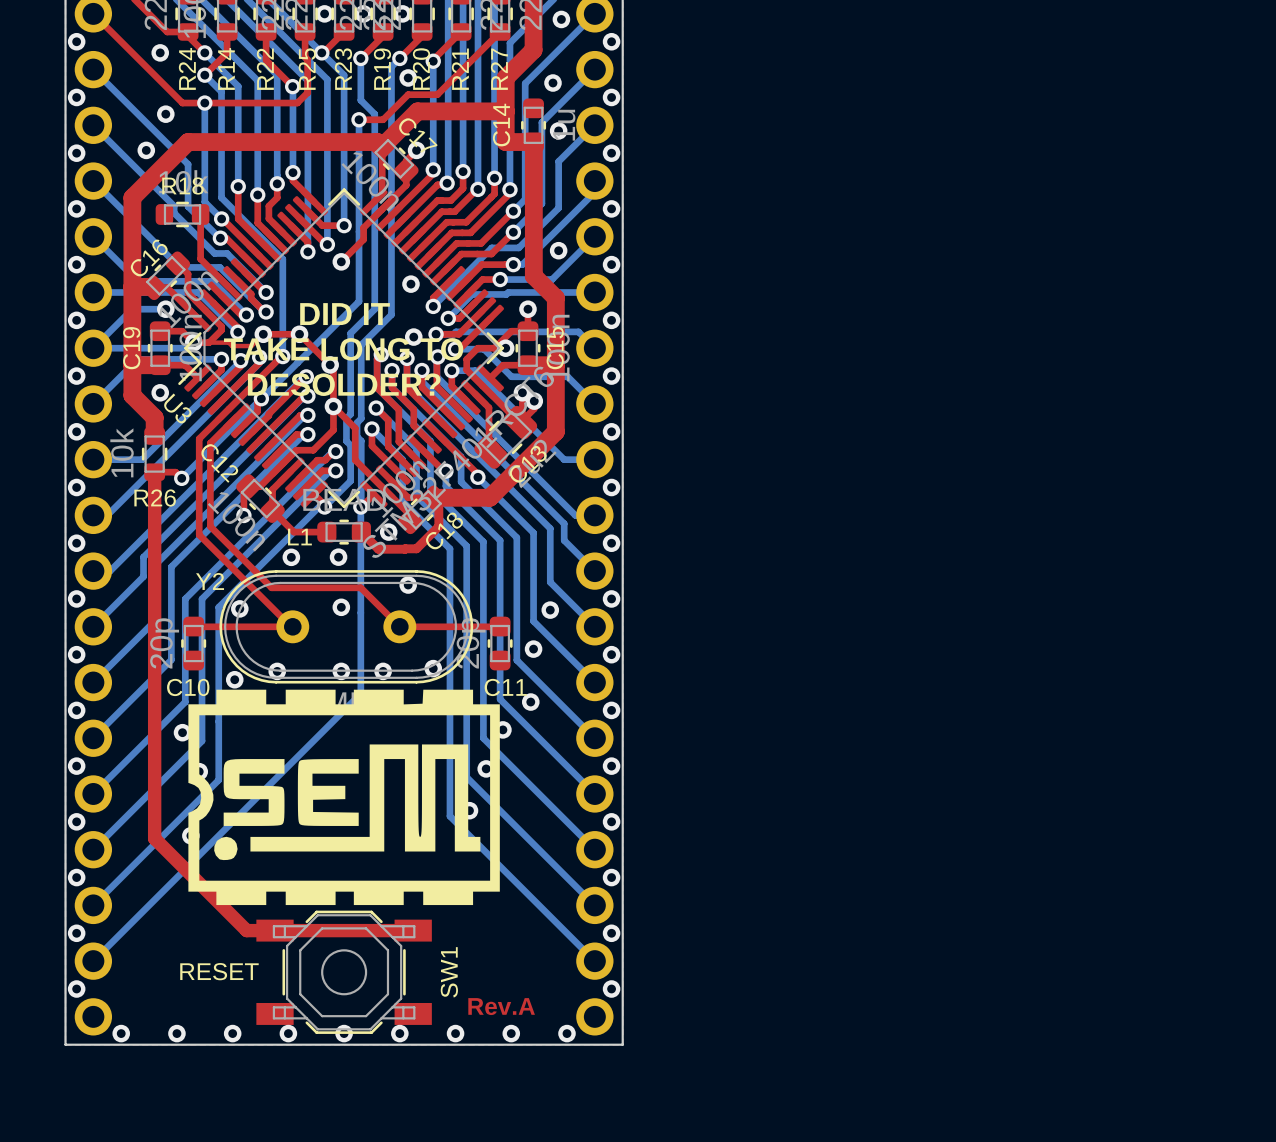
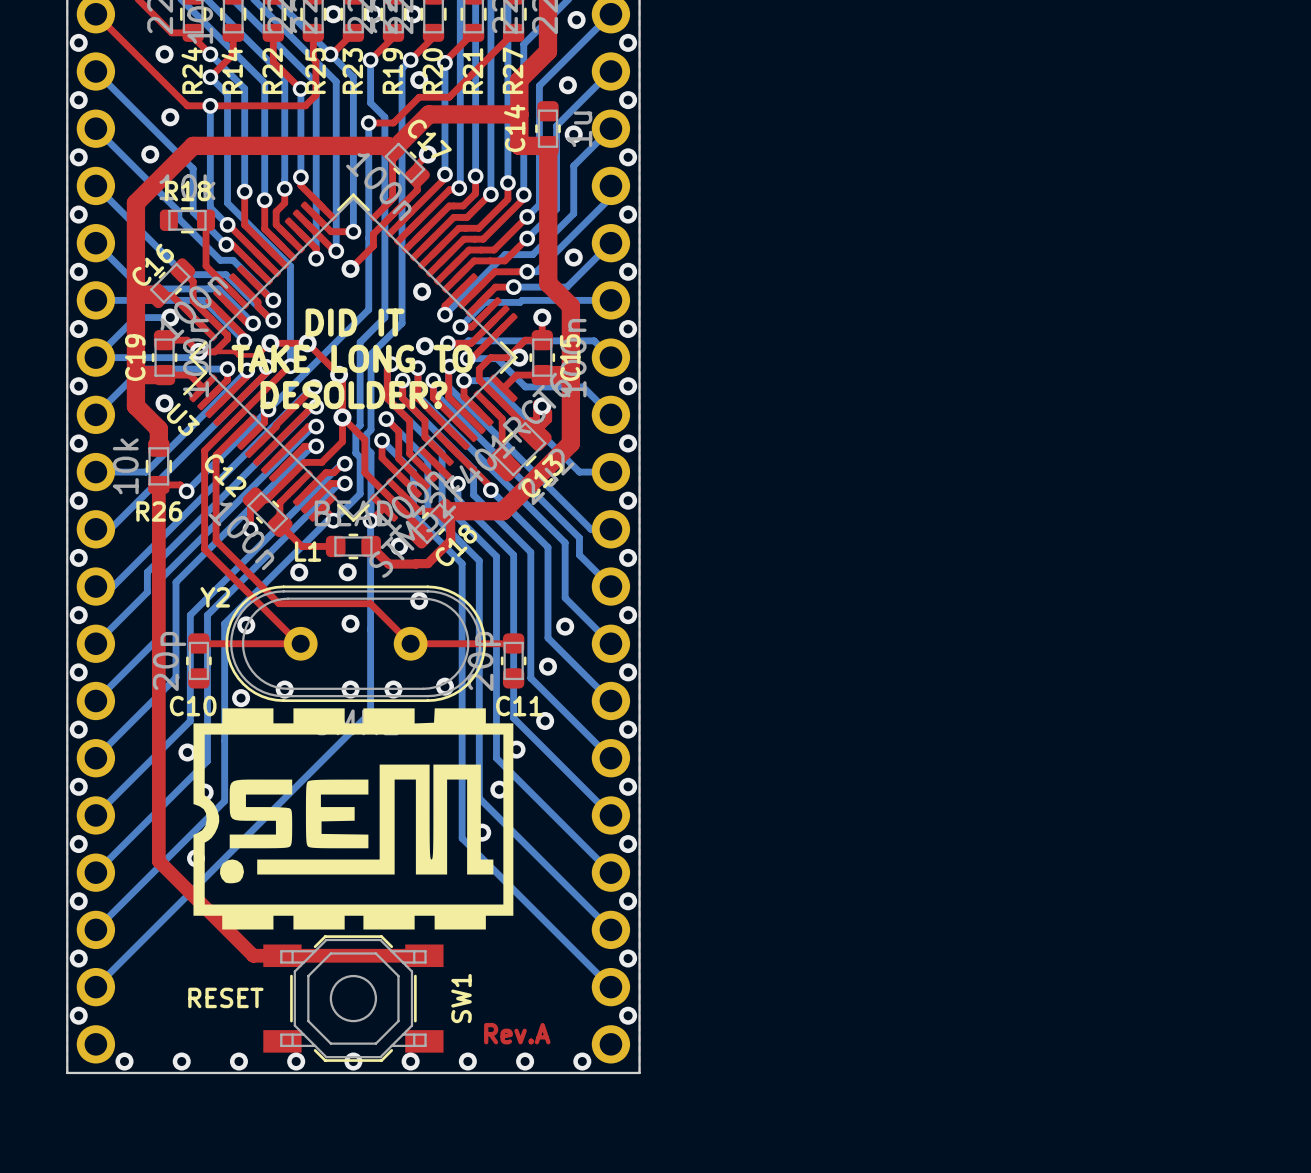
via: (522, 392) -> none
via: none -> (542, 406)
via: (534, 401) -> none

